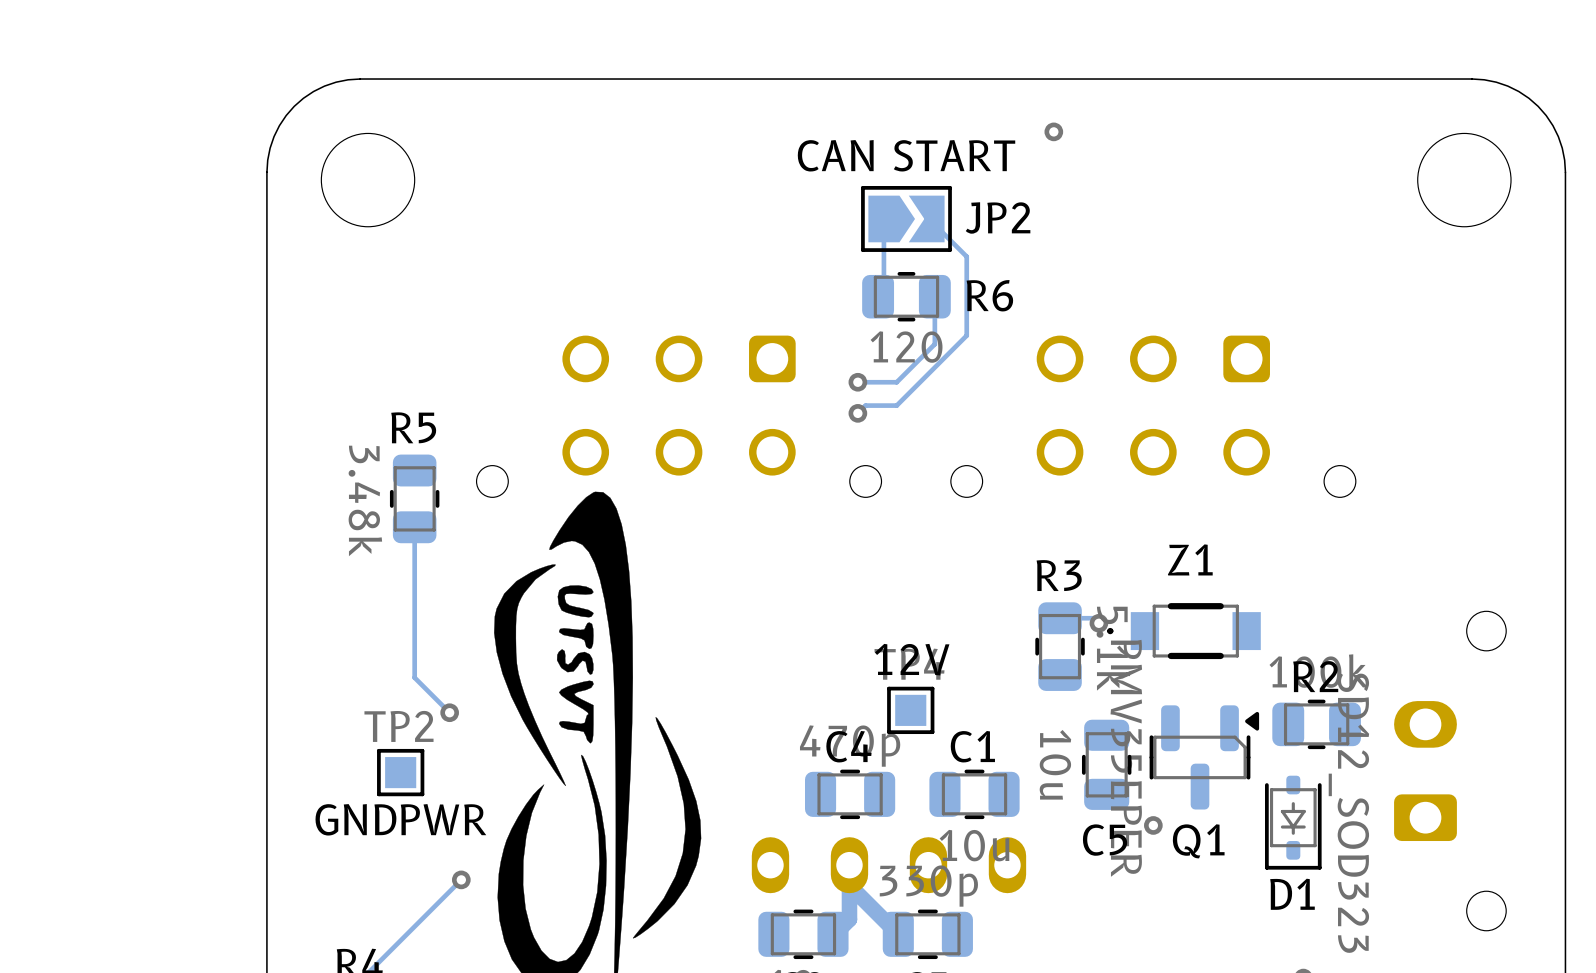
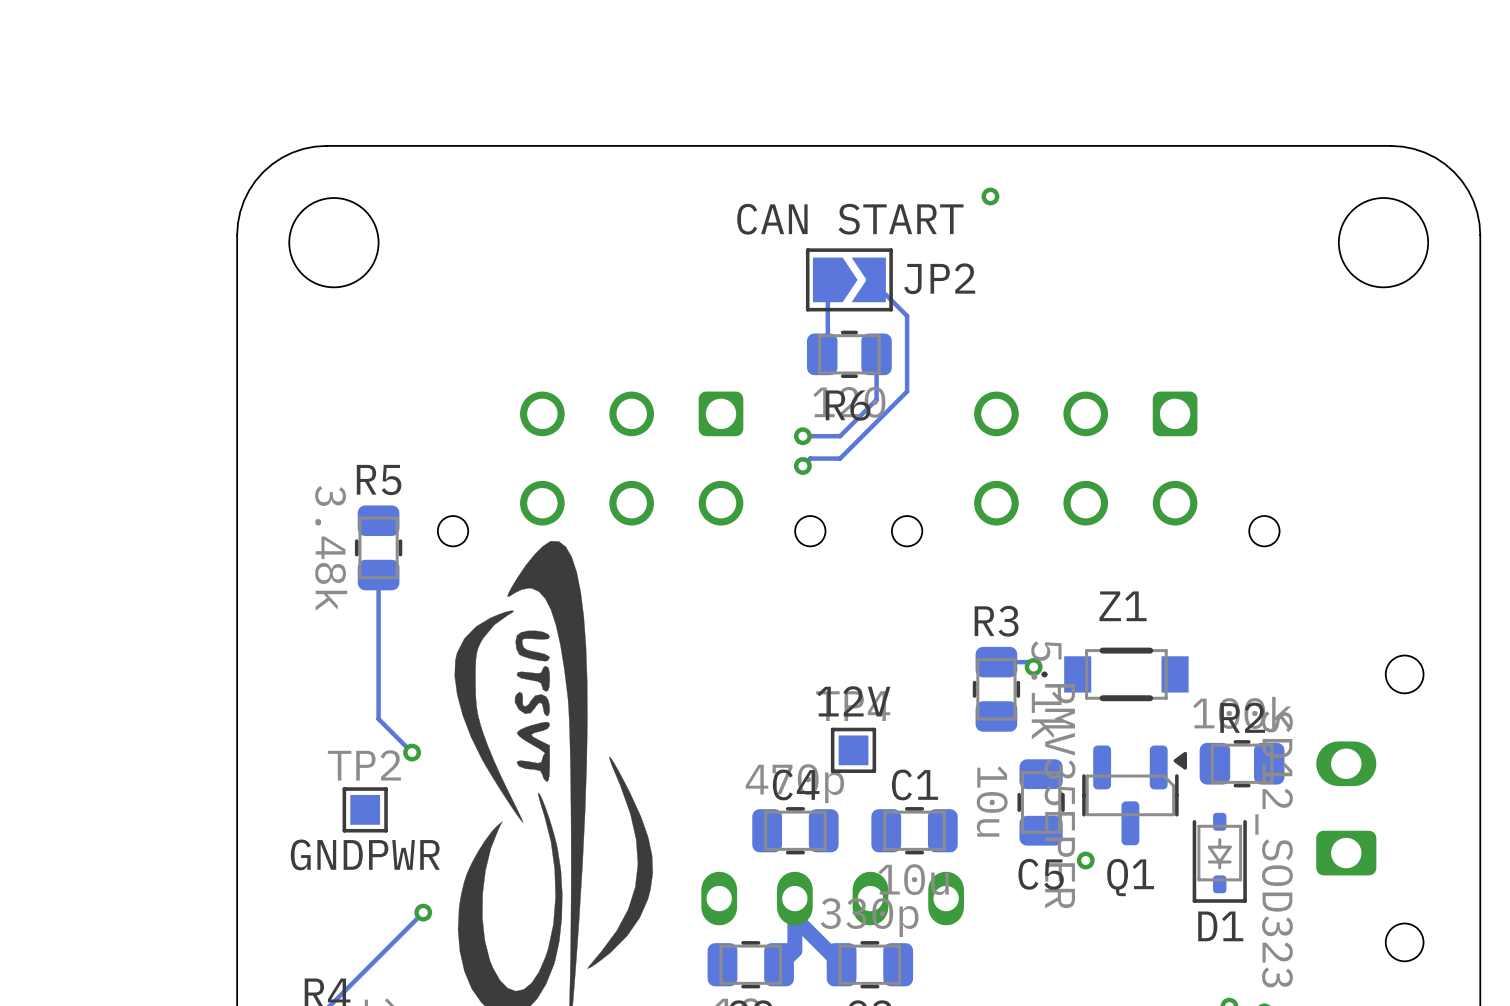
R6 name position: R6 (989, 295) -> R6 (848, 405)

